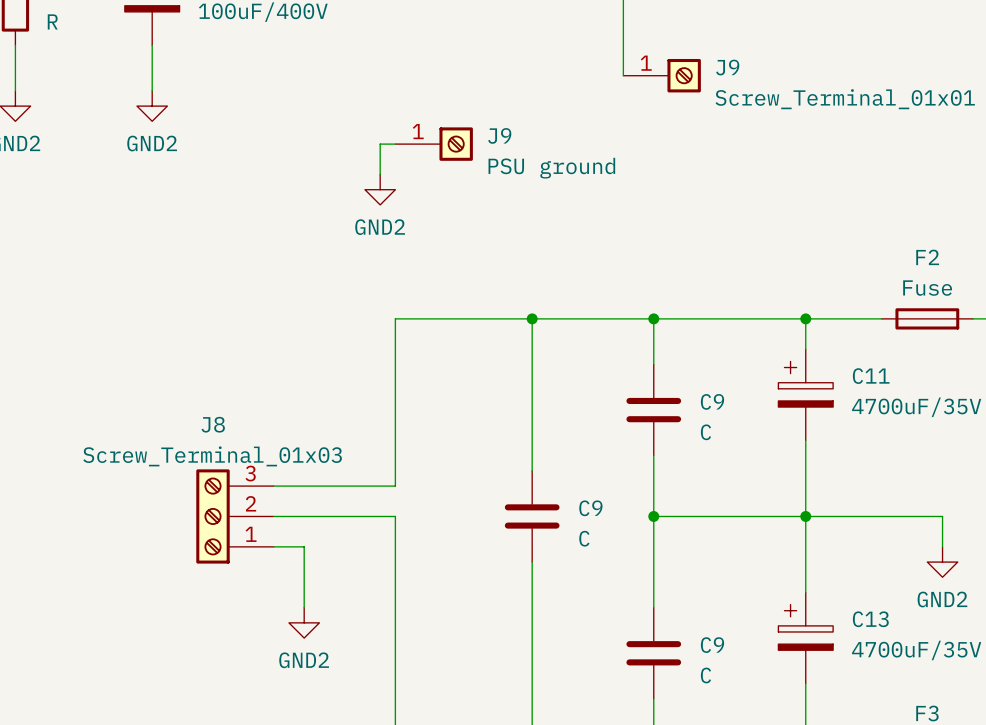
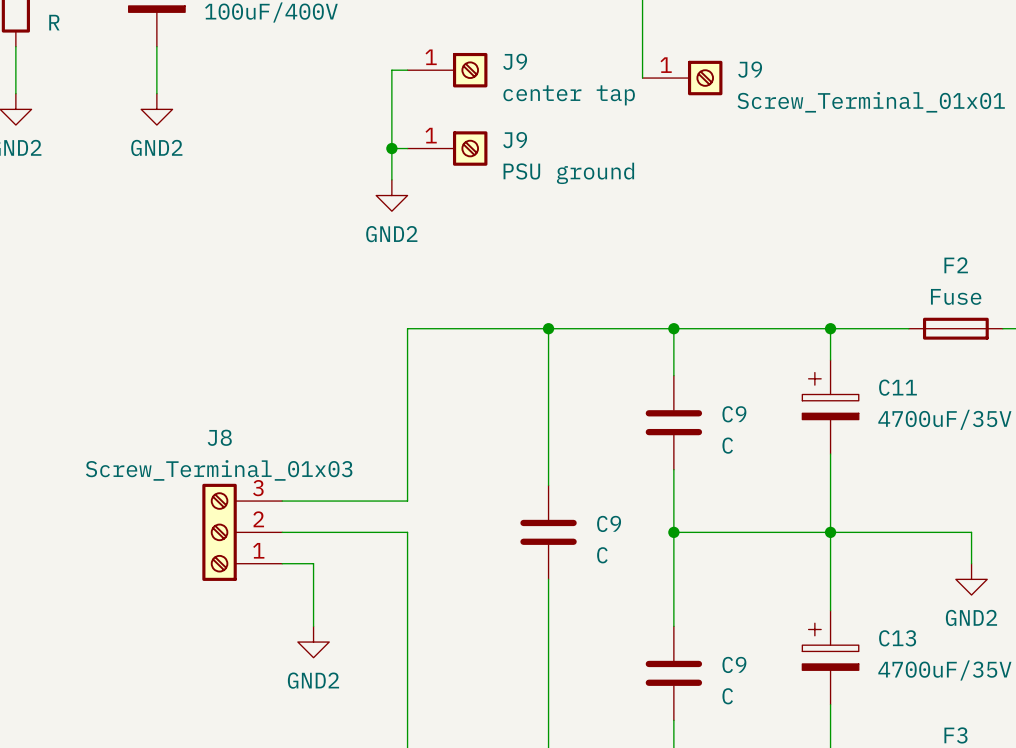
wire: none -> (407, 70) (391, 70) (391, 148)
J9: none -> center tap (447, 70)
junction: none -> (391, 148)

